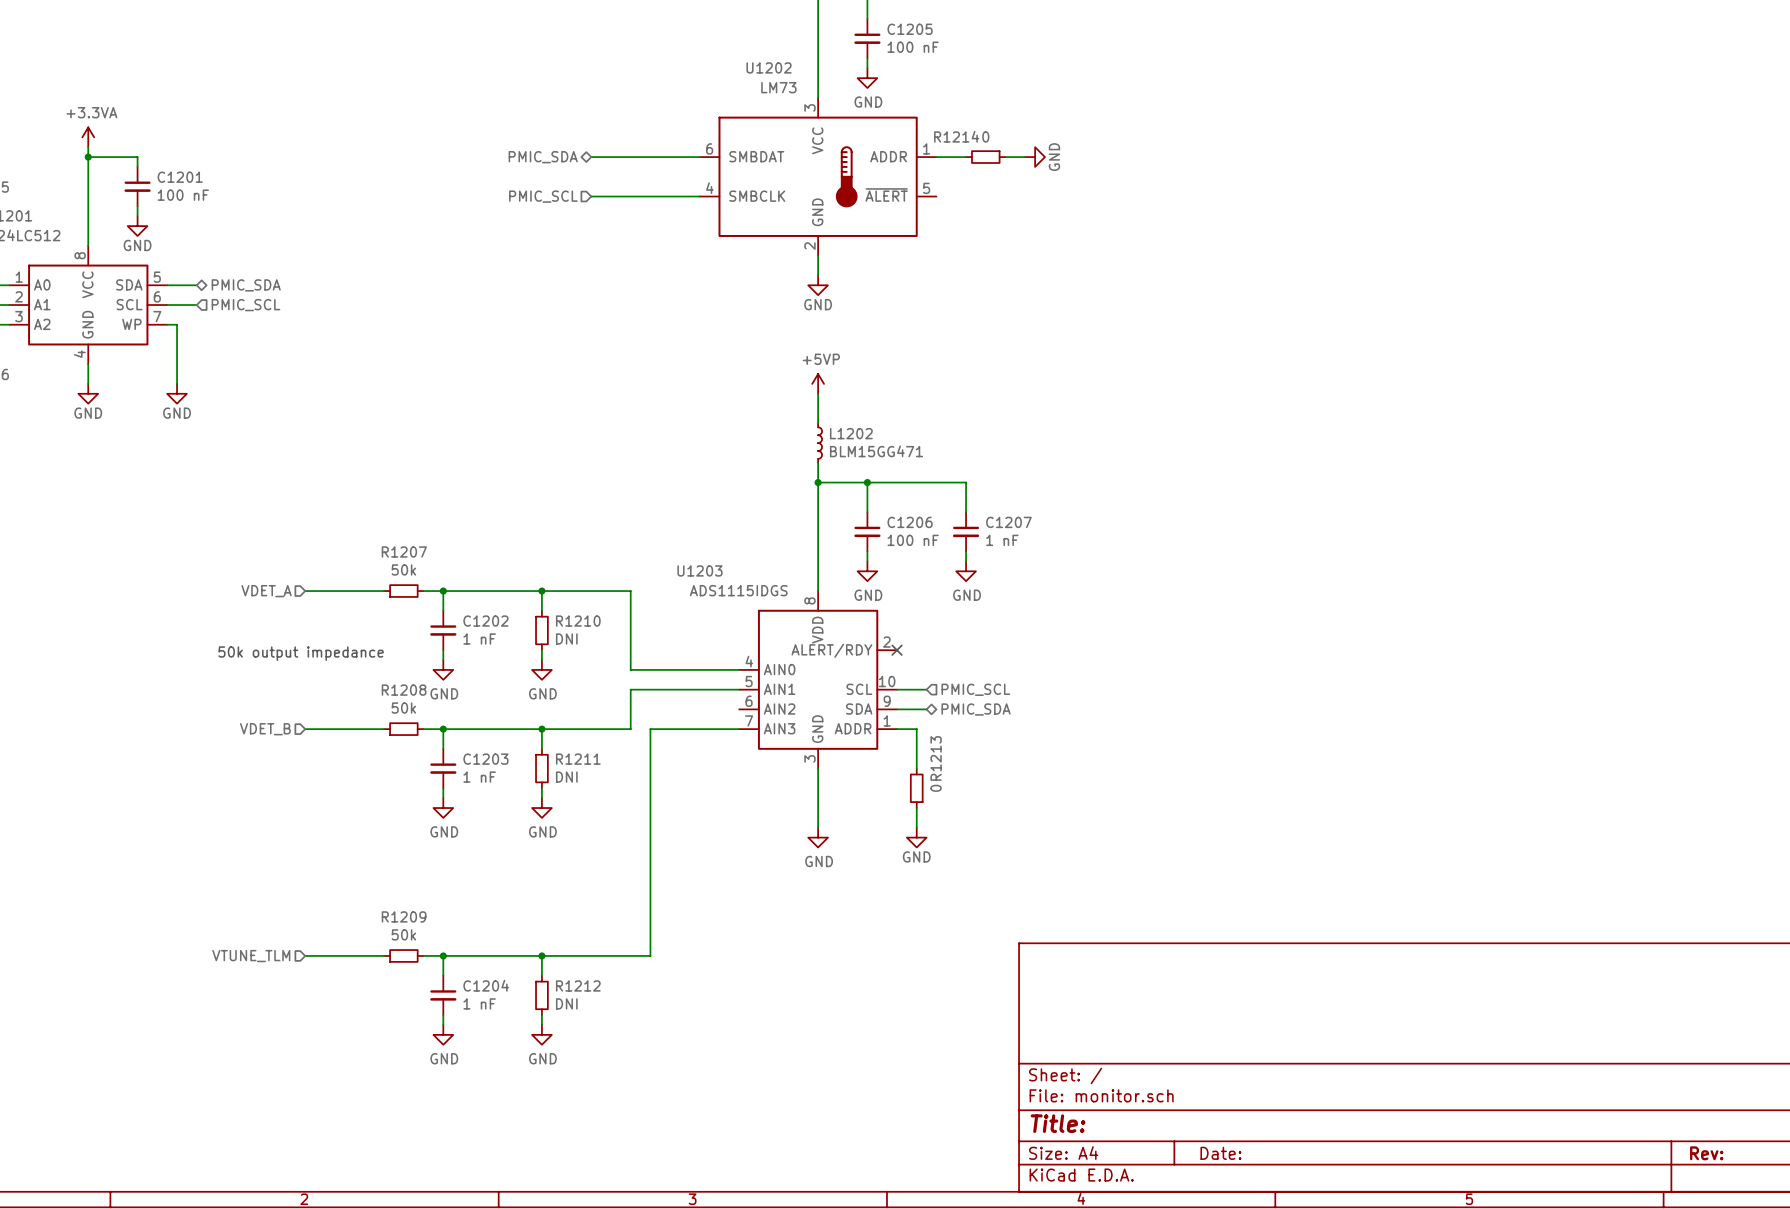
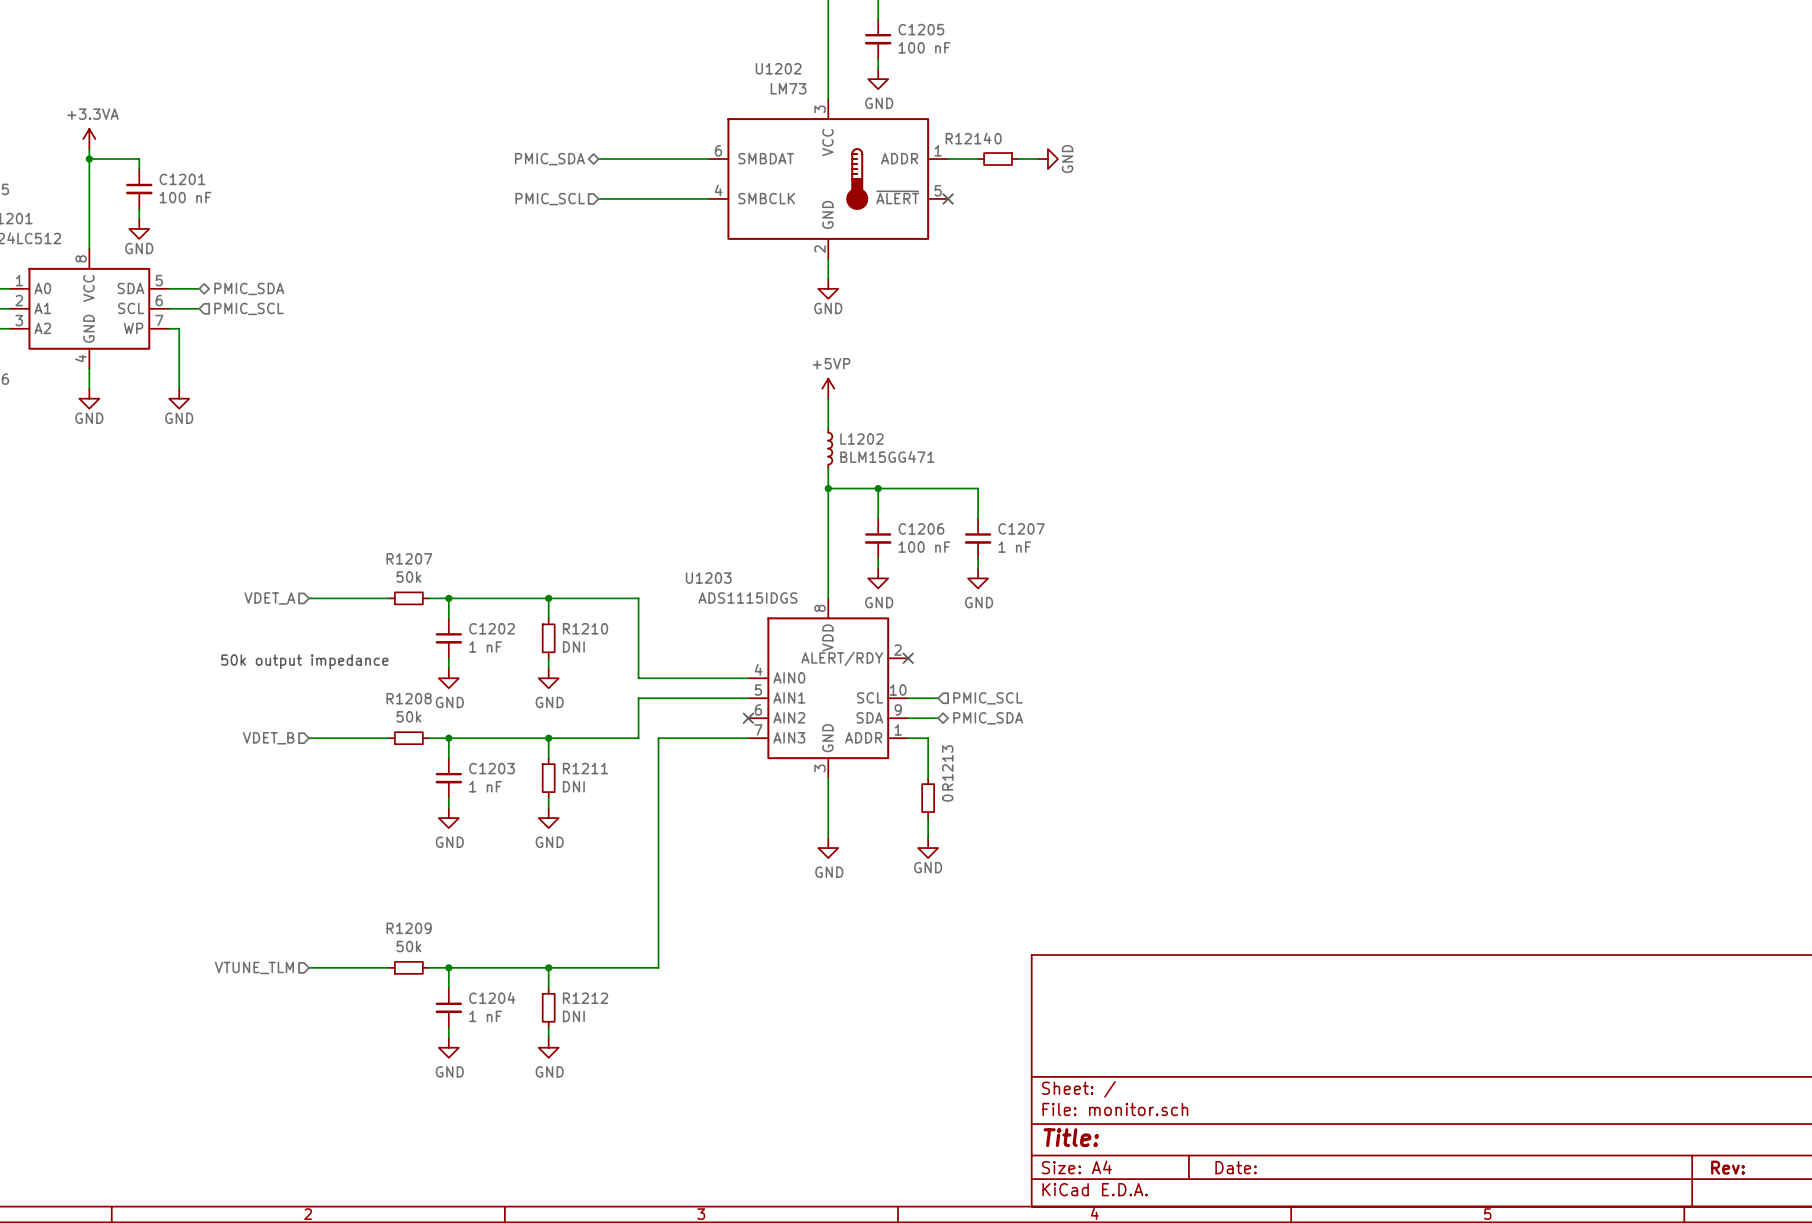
no-connect mark: none -> (948, 198)
no-connect mark: none -> (748, 718)

